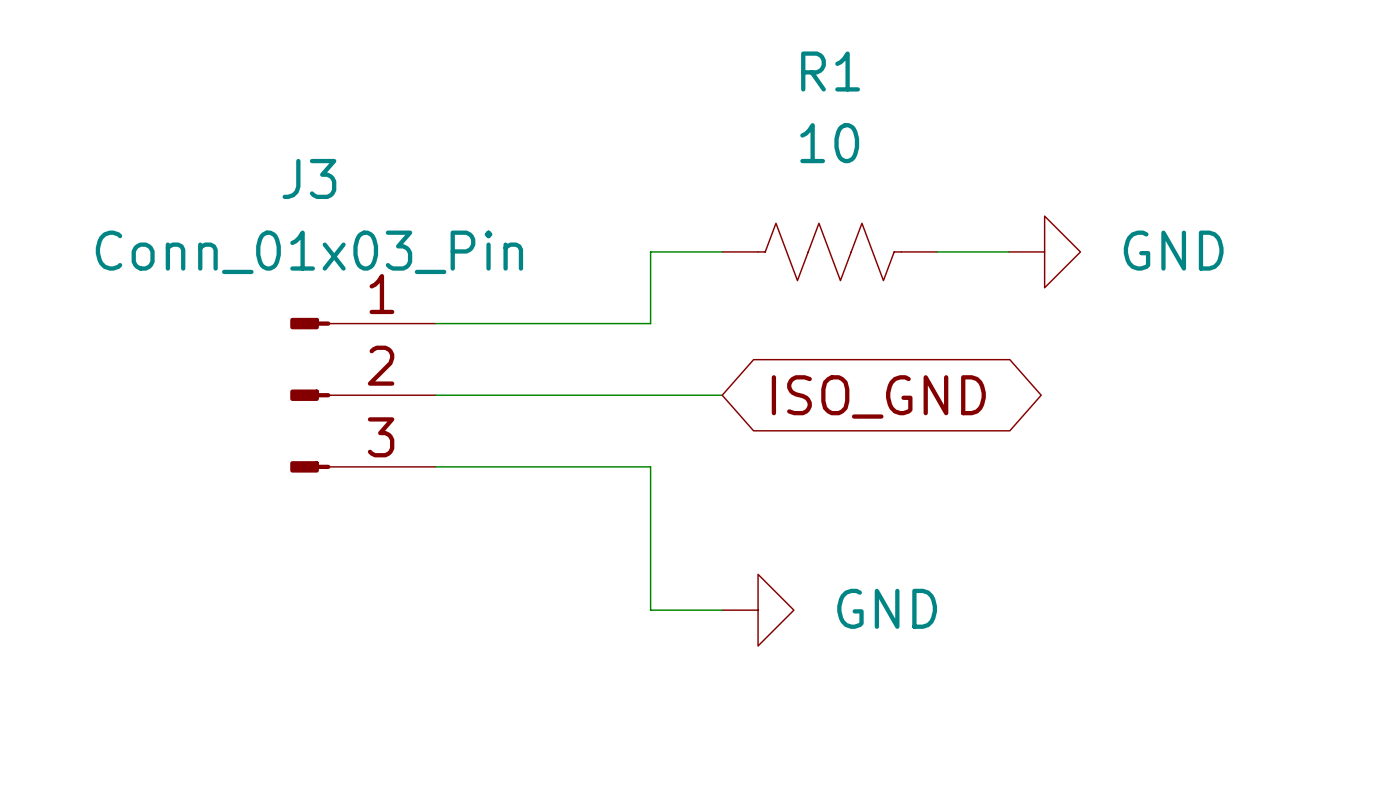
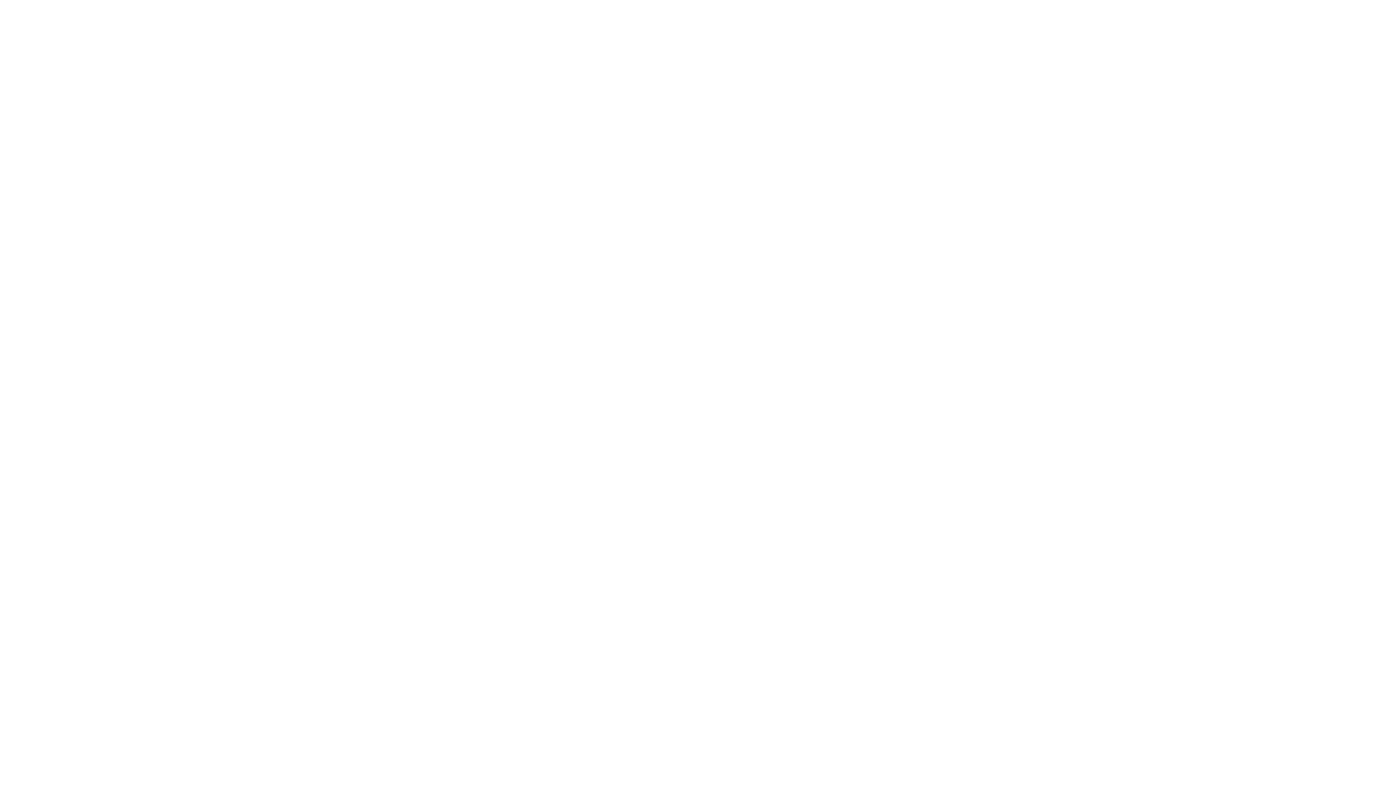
wire: (722, 251) (650, 251) (650, 323) (435, 323) -> none
R1: 10 (829, 251) -> none
wire: (937, 251) (1008, 251) -> none
power symbol: GND (1044, 251) -> none
J3: Conn_01x03_Pin (362, 395) -> none
wire: (435, 395) (722, 395) -> none
global label: ISO_GND (878, 396) -> none
wire: (435, 466) (650, 466) (650, 610) (722, 610) -> none
power symbol: GND (758, 610) -> none

